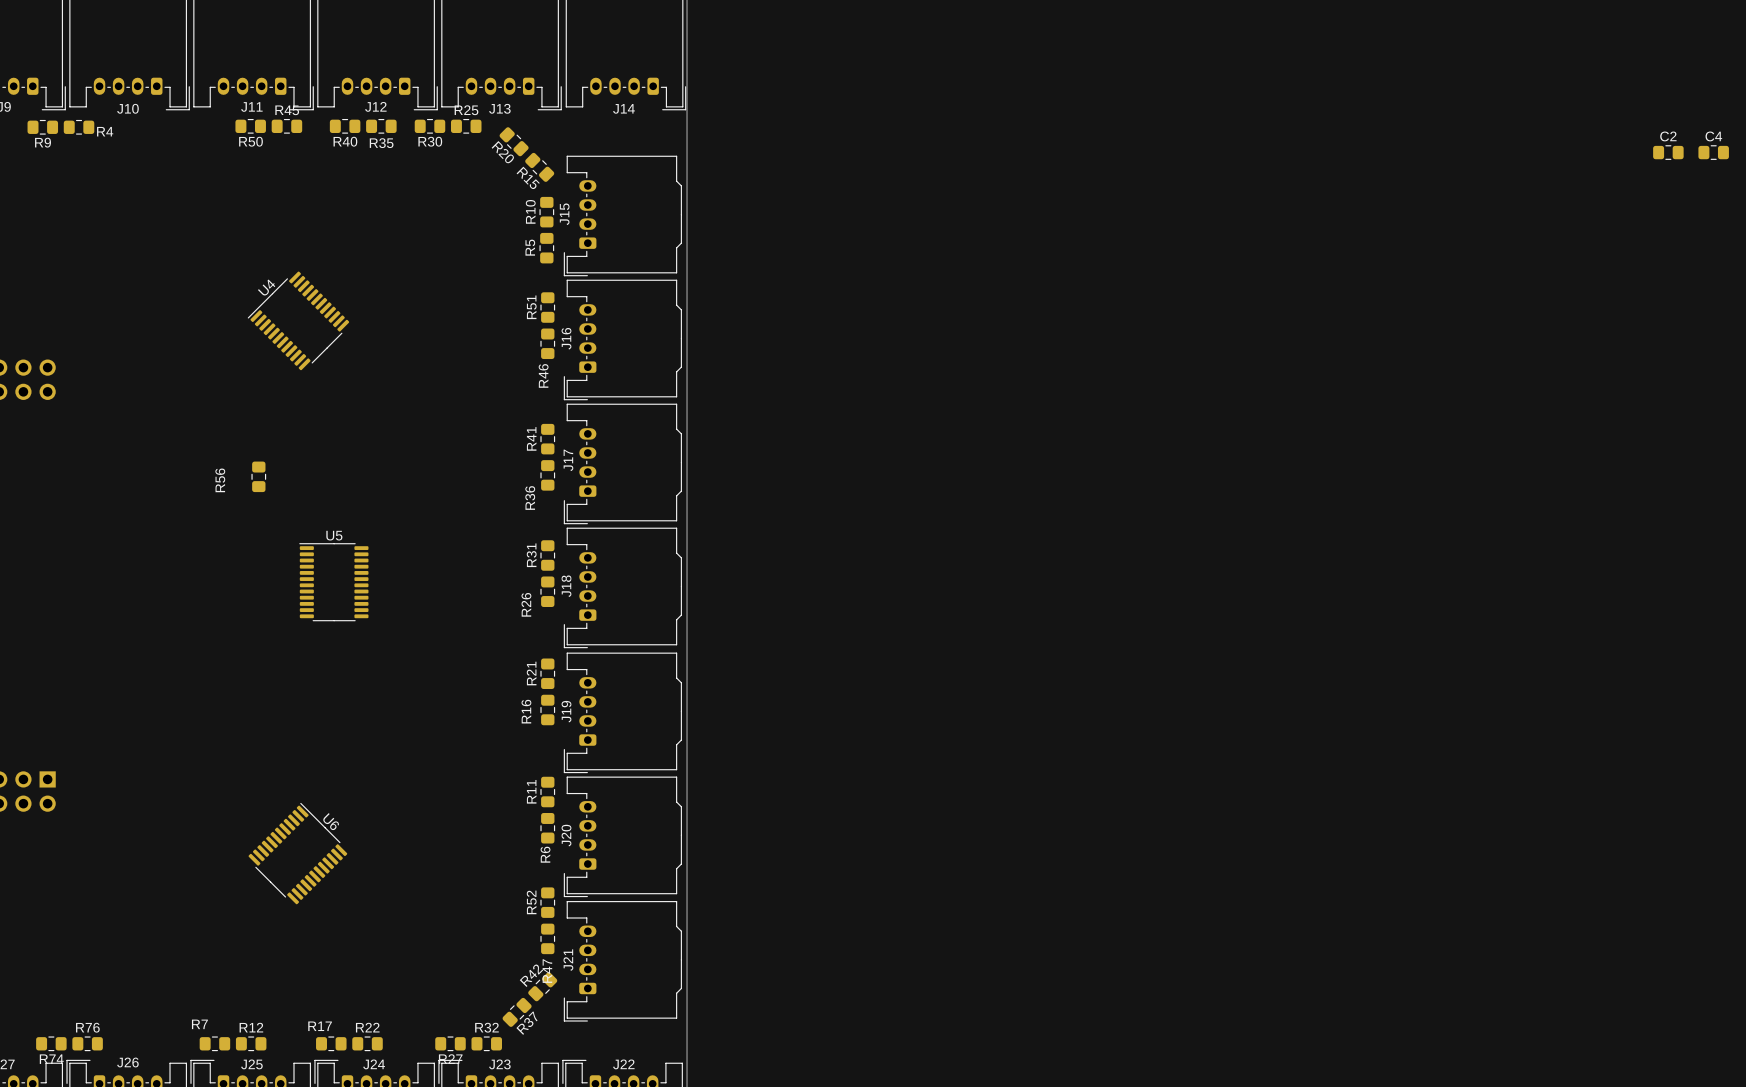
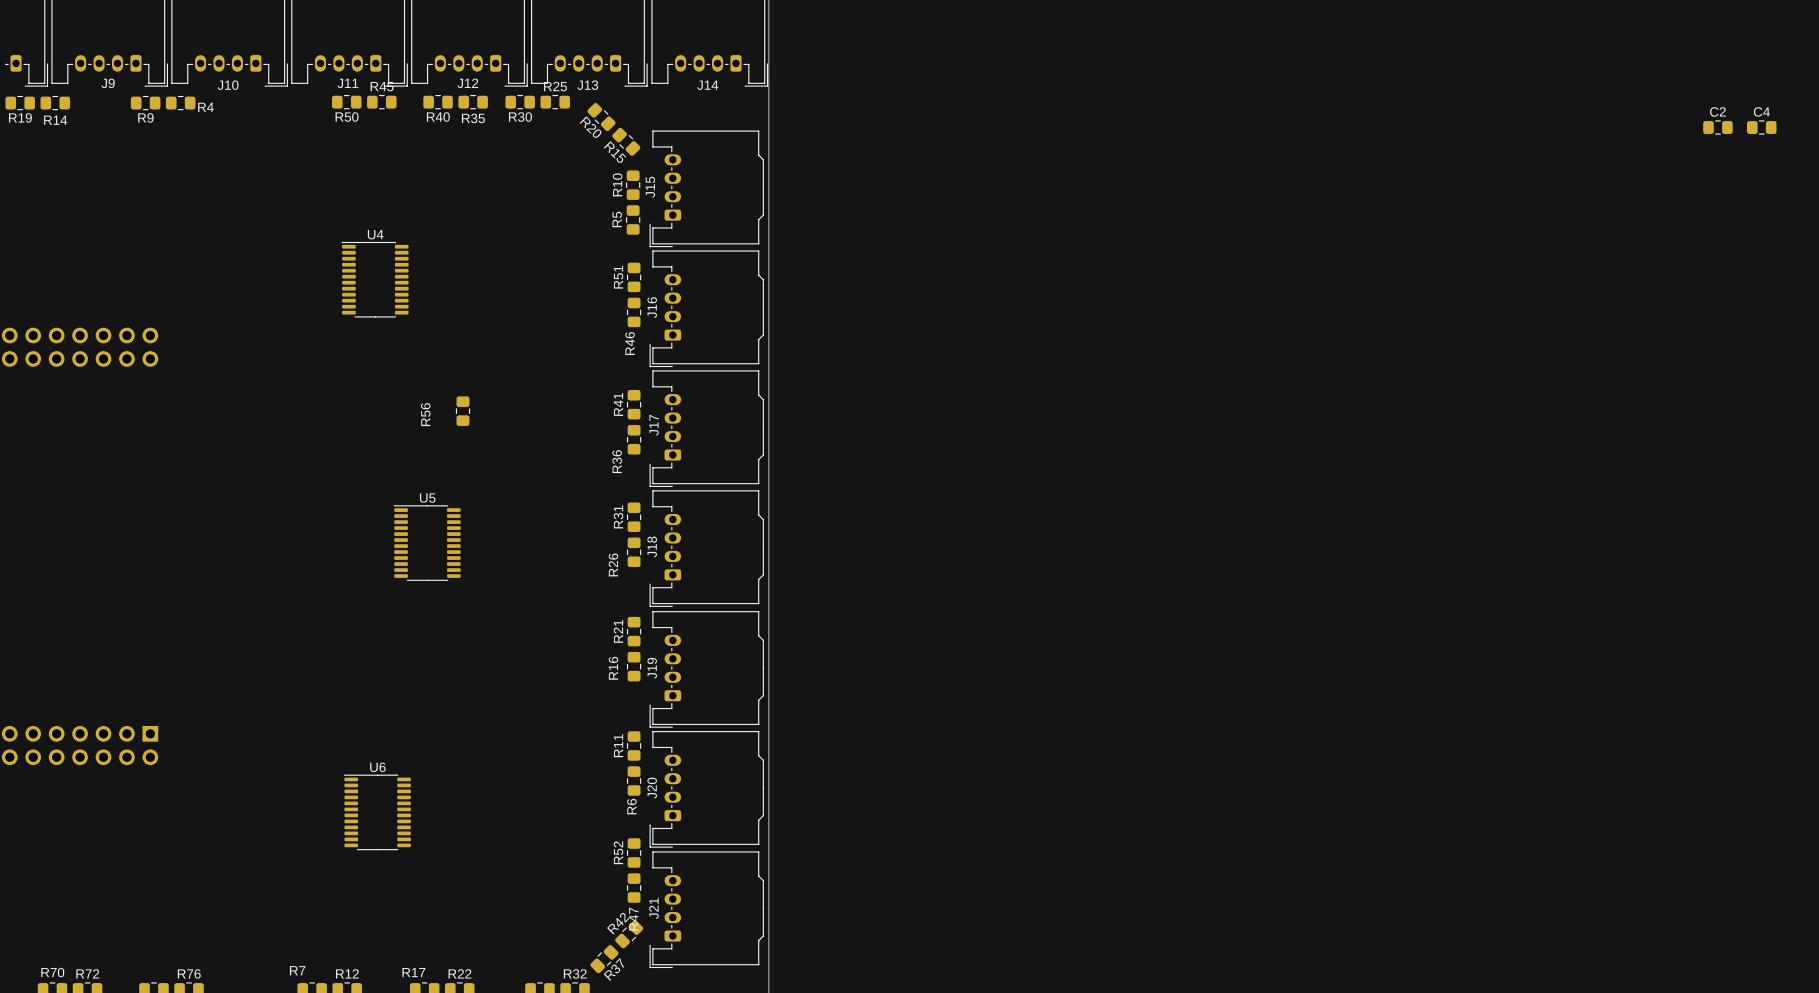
U4 rotation: 0° (298, 320) -> 45° clockwise (375, 279)
R56 position: (258, 476) -> (462, 411)
U6 rotation: 0° (297, 853) -> 45° counterclockwise (377, 812)

